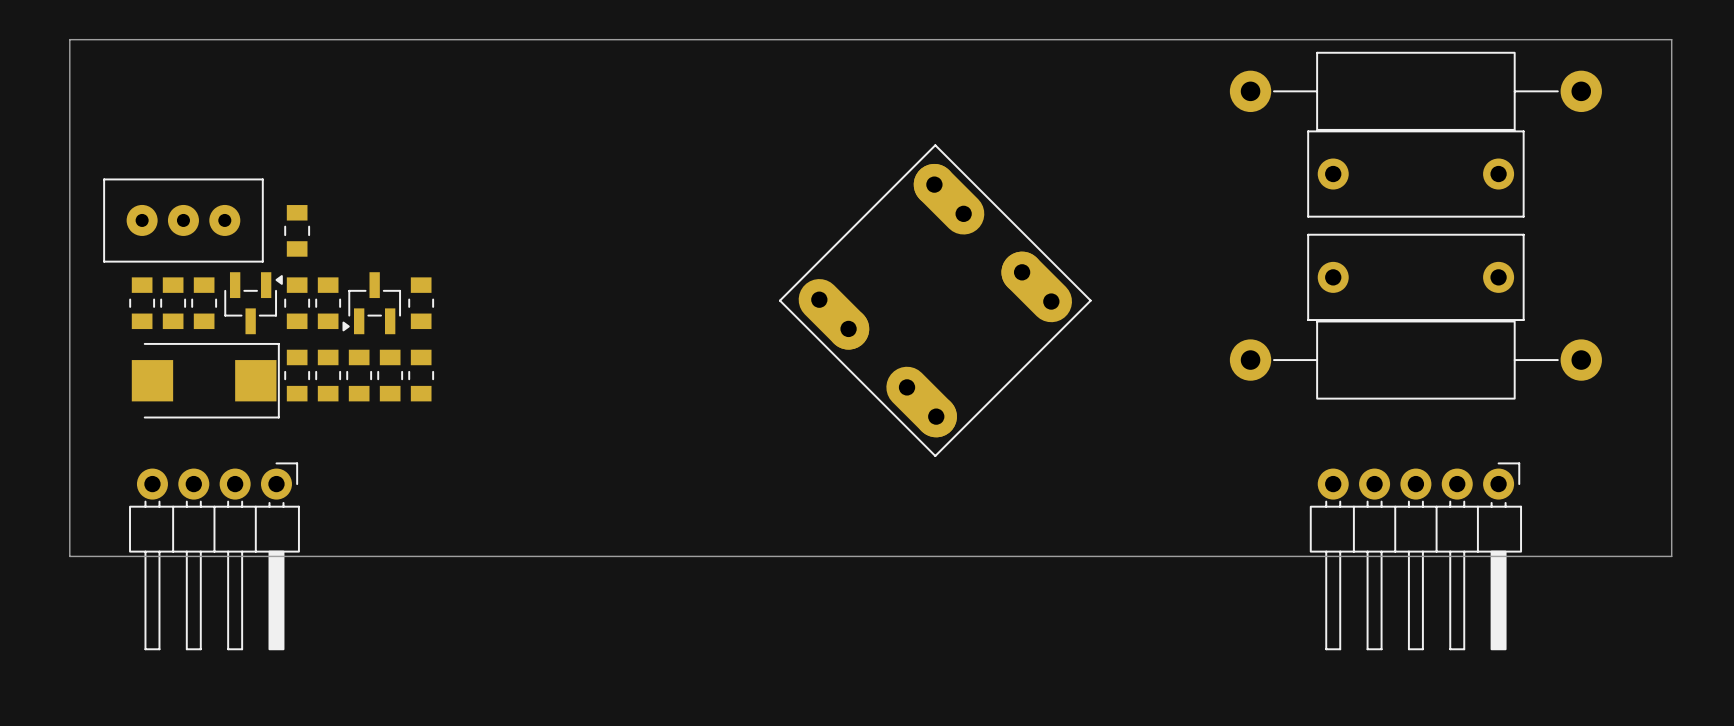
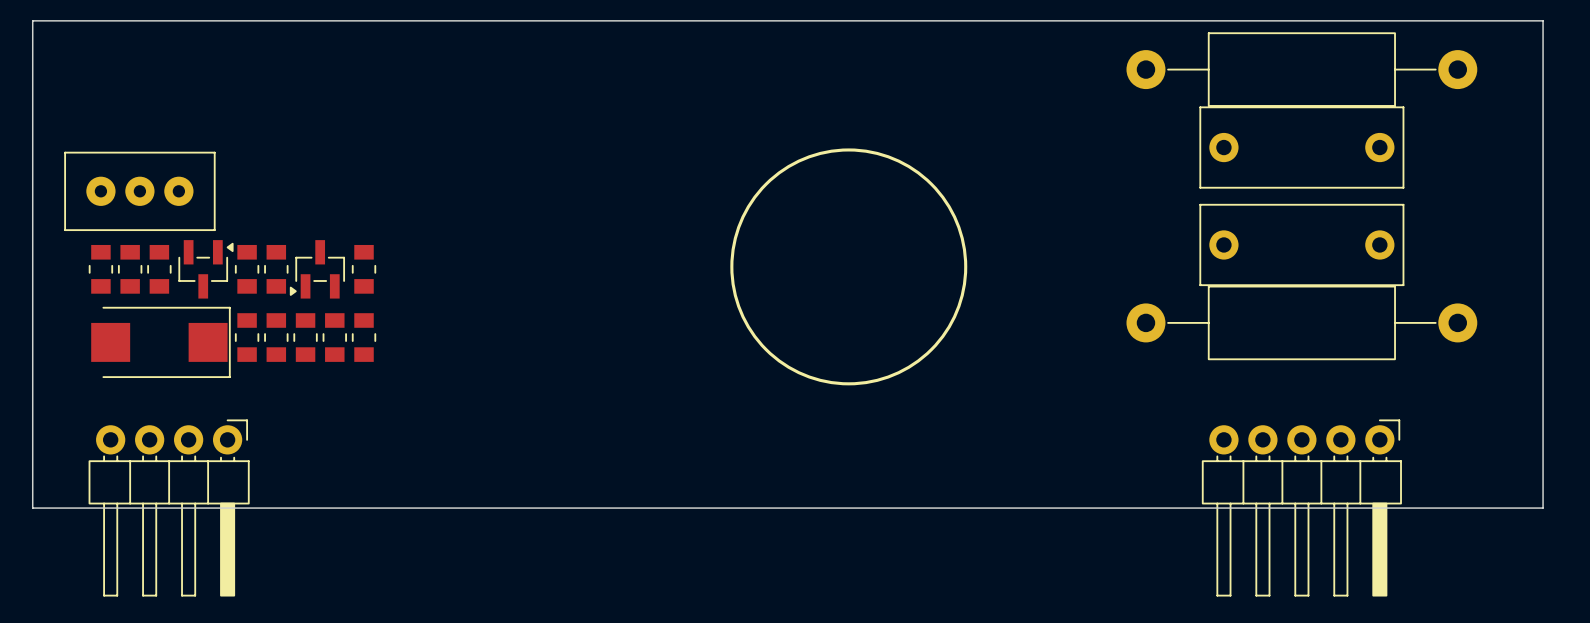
drawing: none -> [730, 148, 968, 386]
part: (297, 230) -> none
part: (935, 300) -> none

